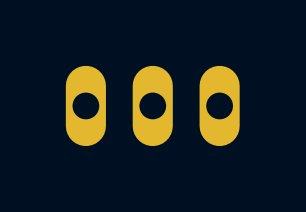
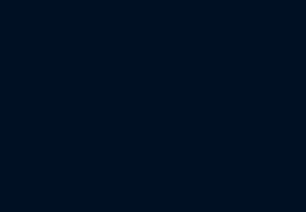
part: (152, 105) -> none

